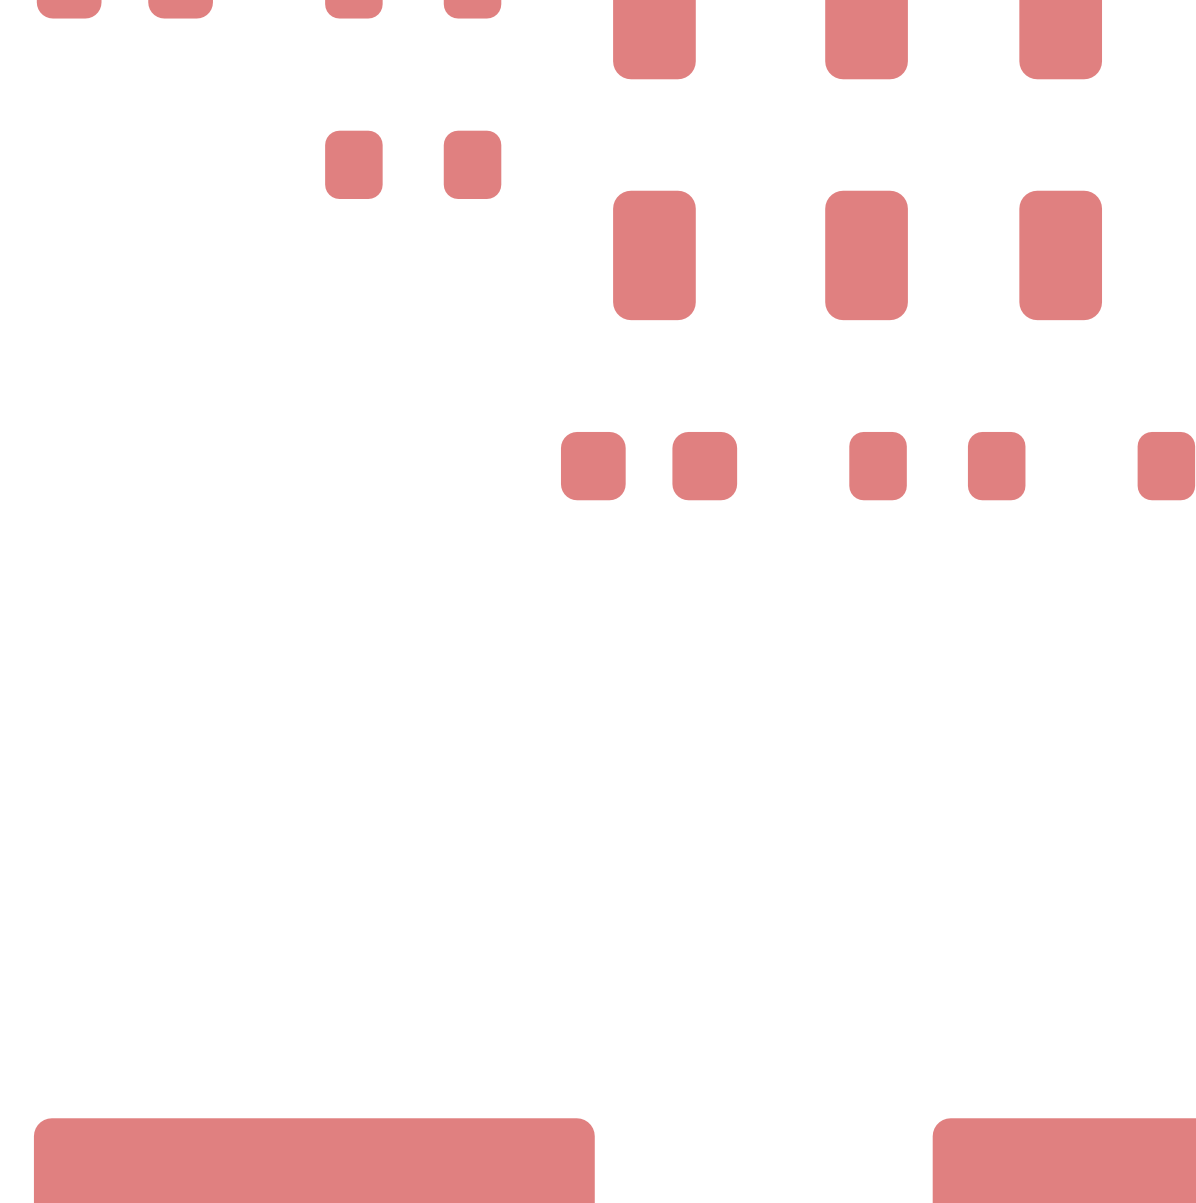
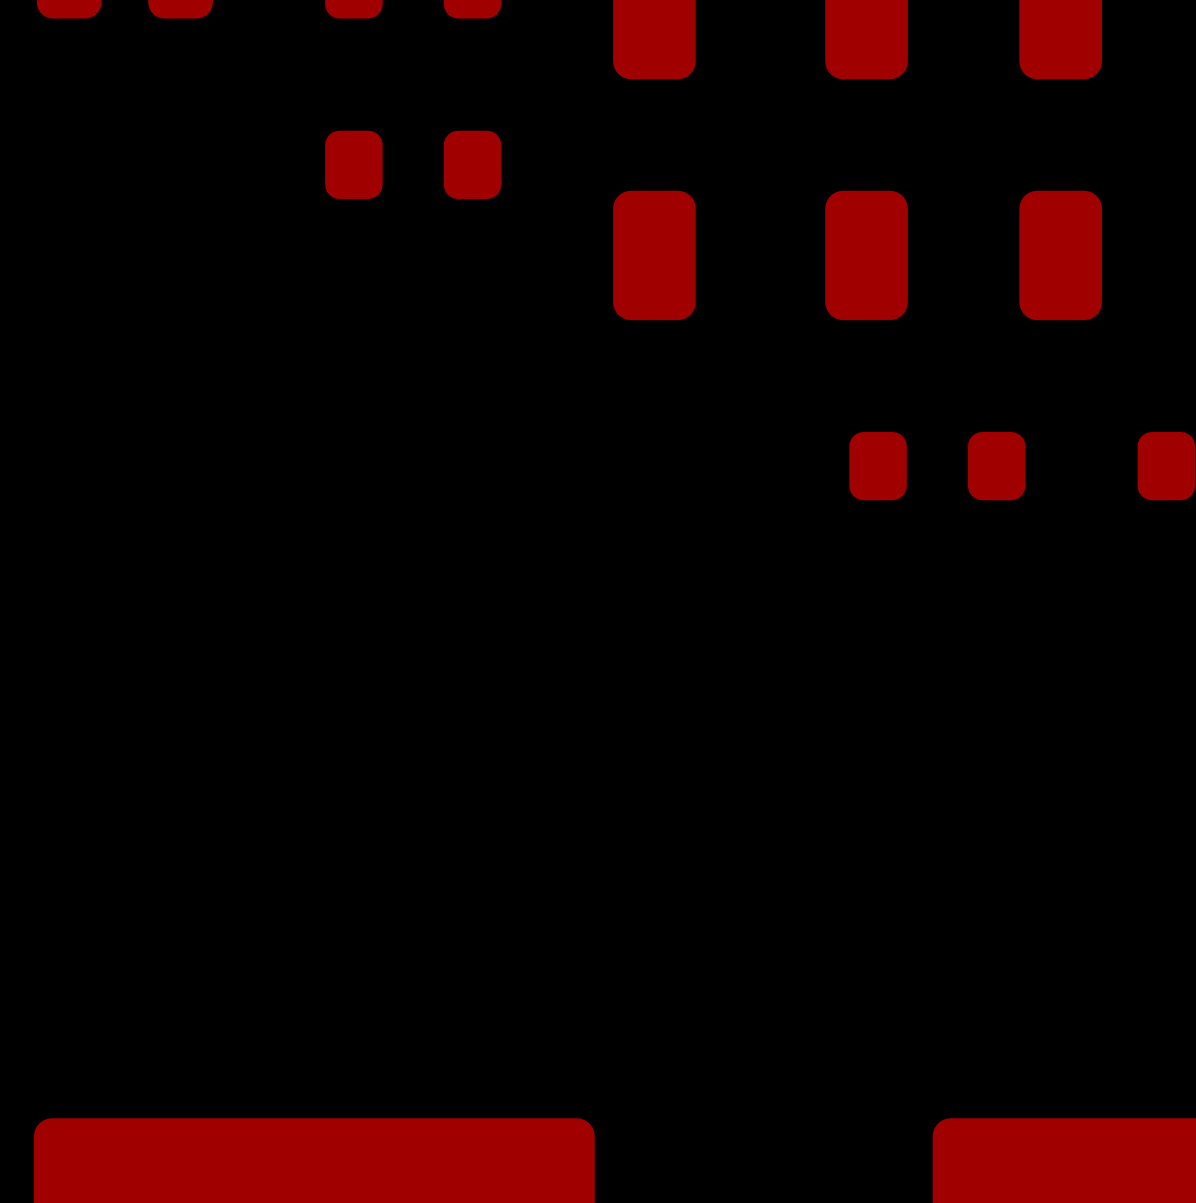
part: (649, 466) -> none

